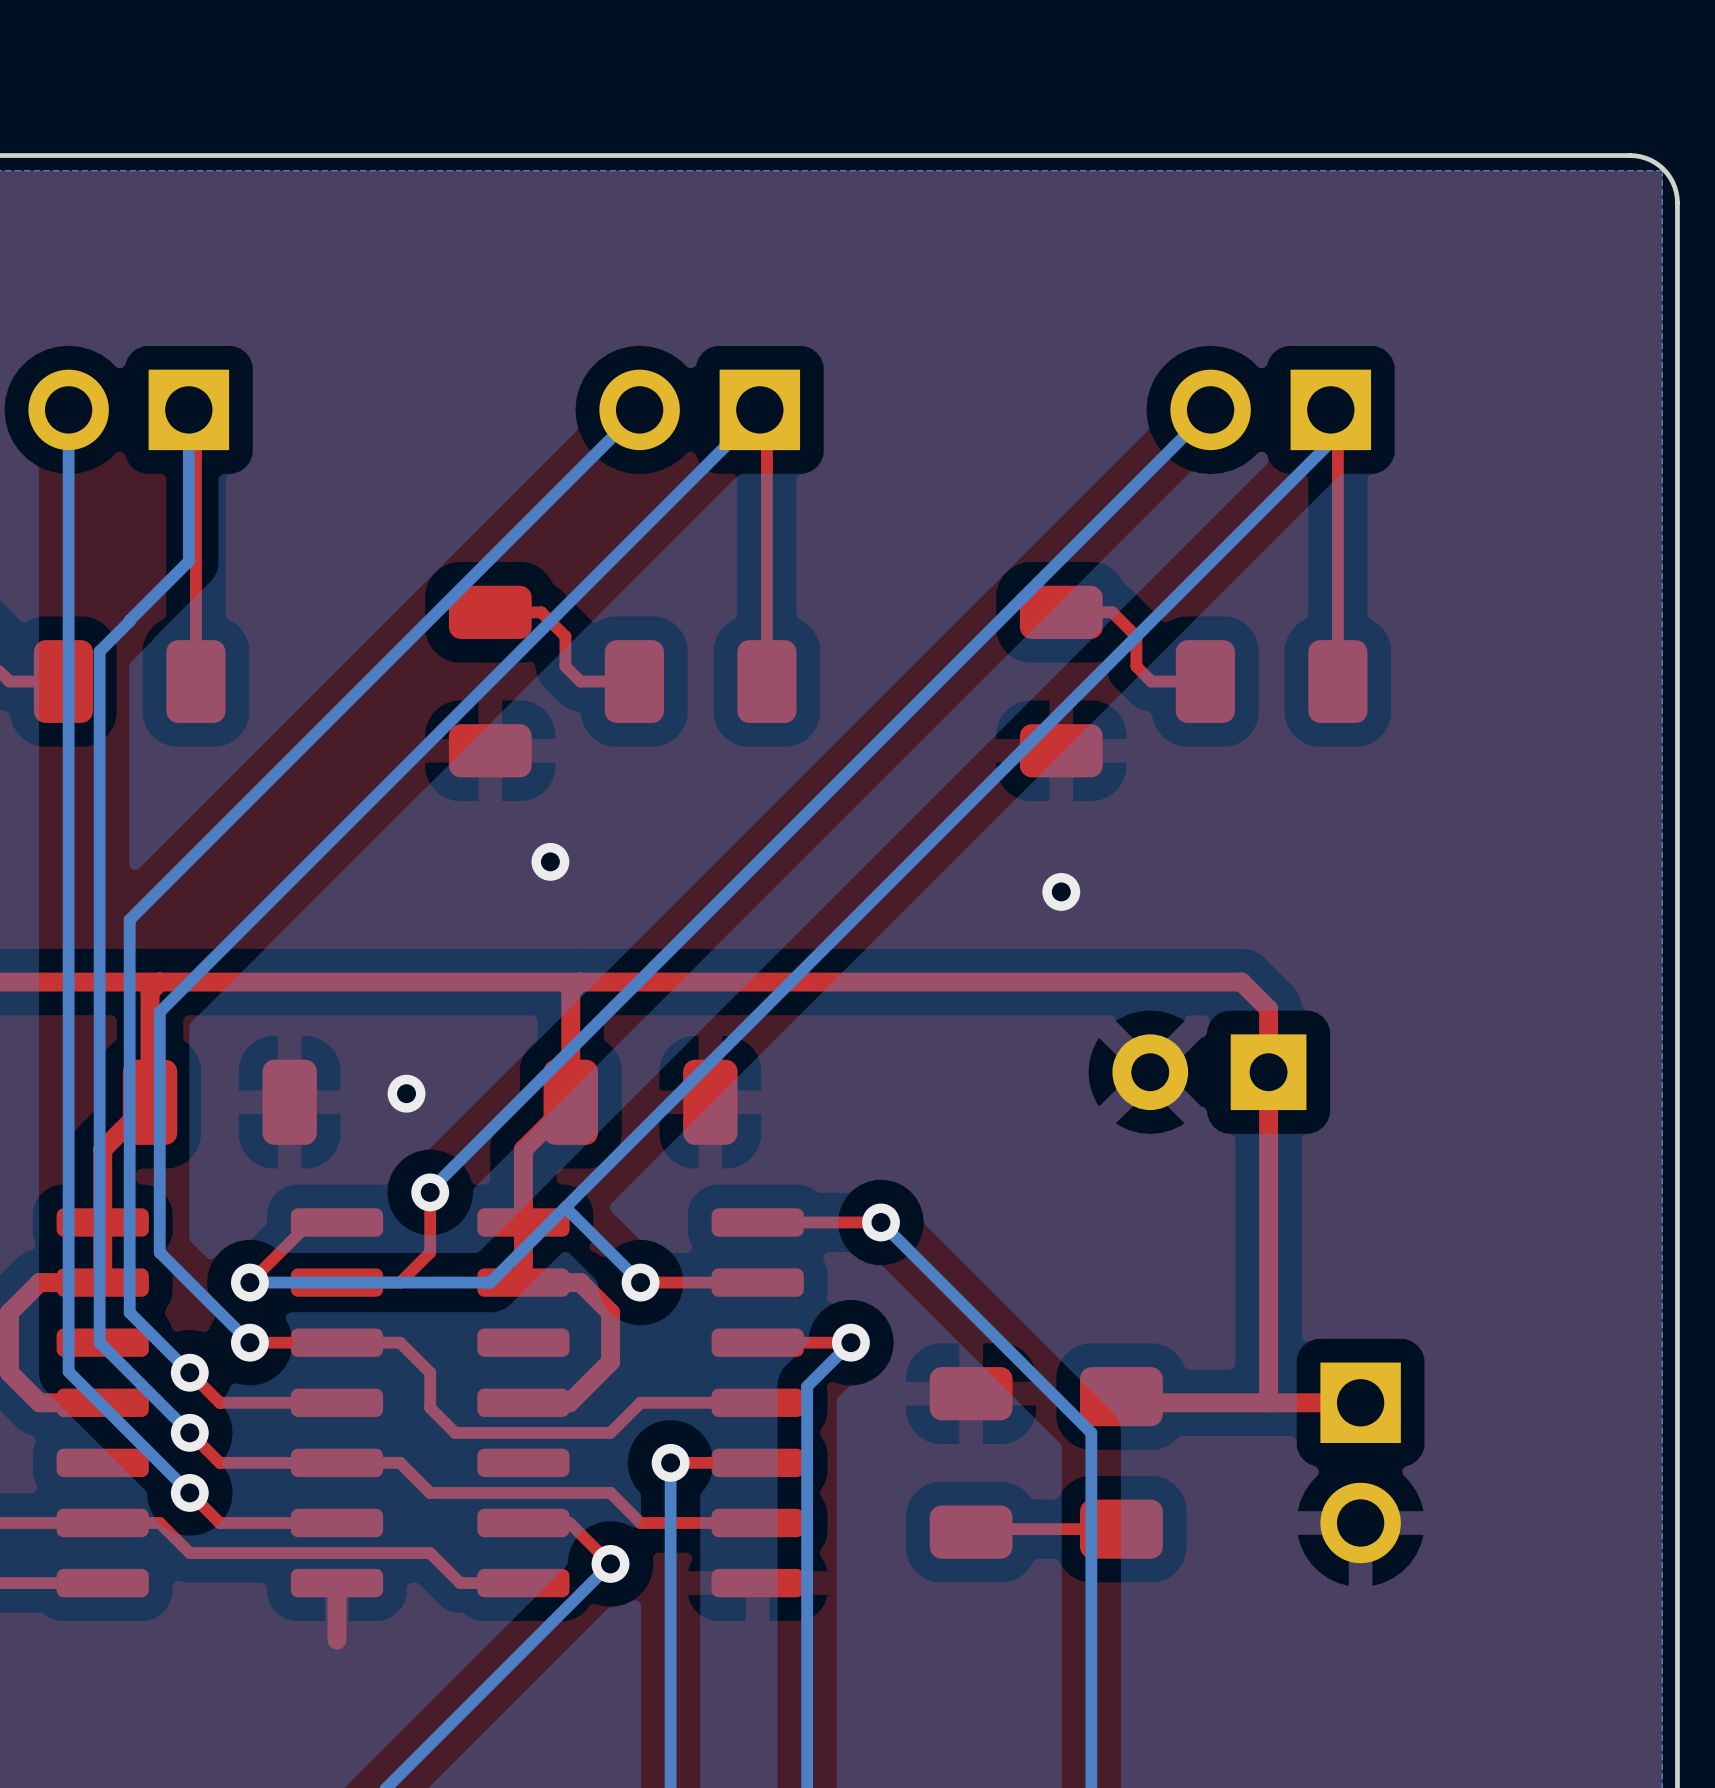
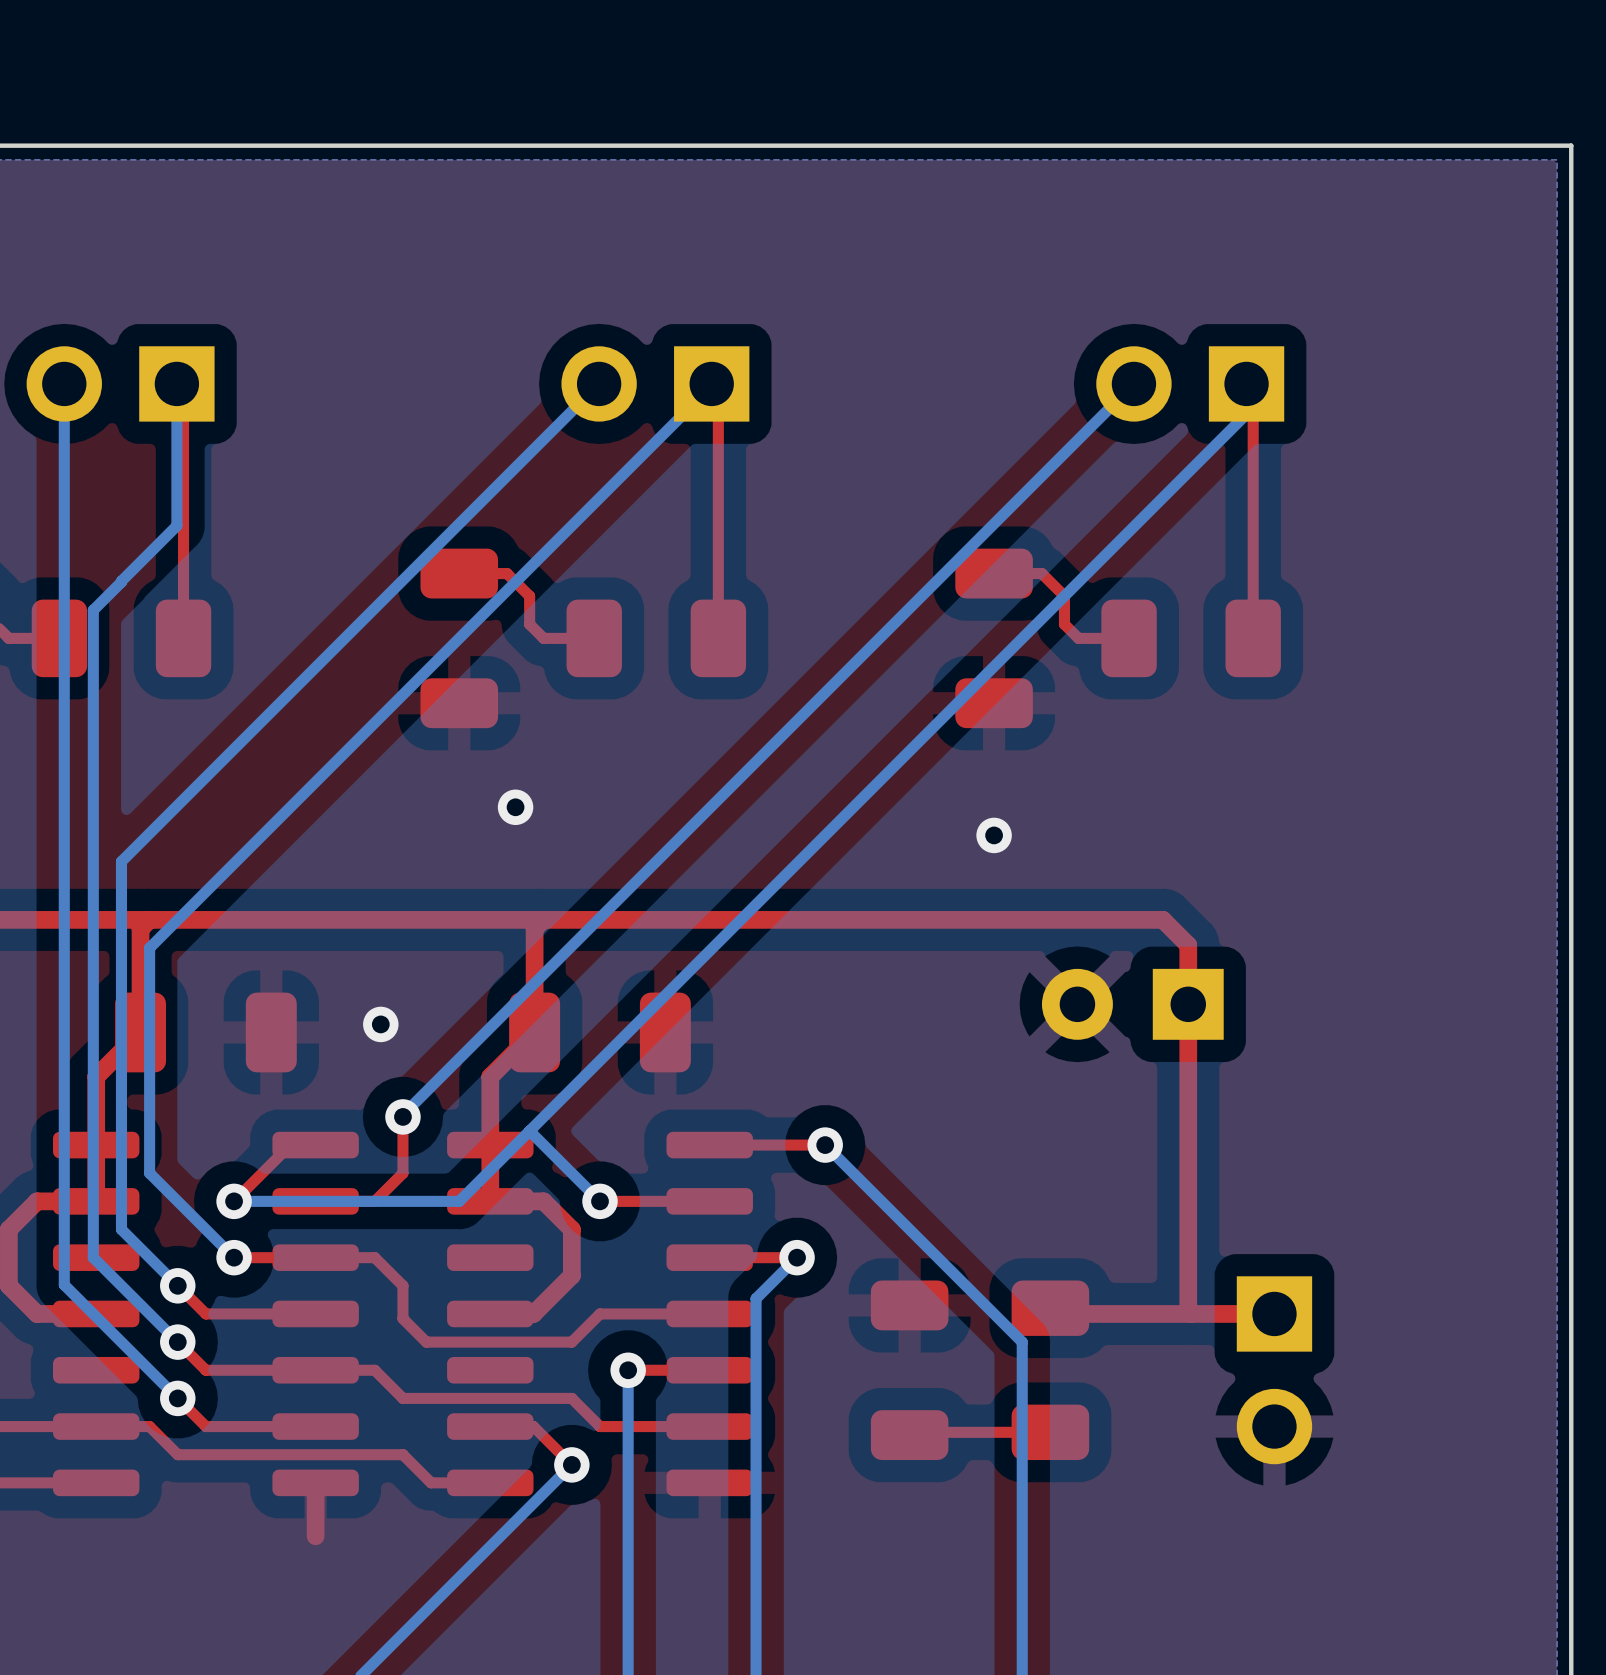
board edge: (1630, 155) (1650, 160) (1663, 169) (1672, 182) (1677, 202) -> (1526, 145) (1571, 145) (1571, 190)

